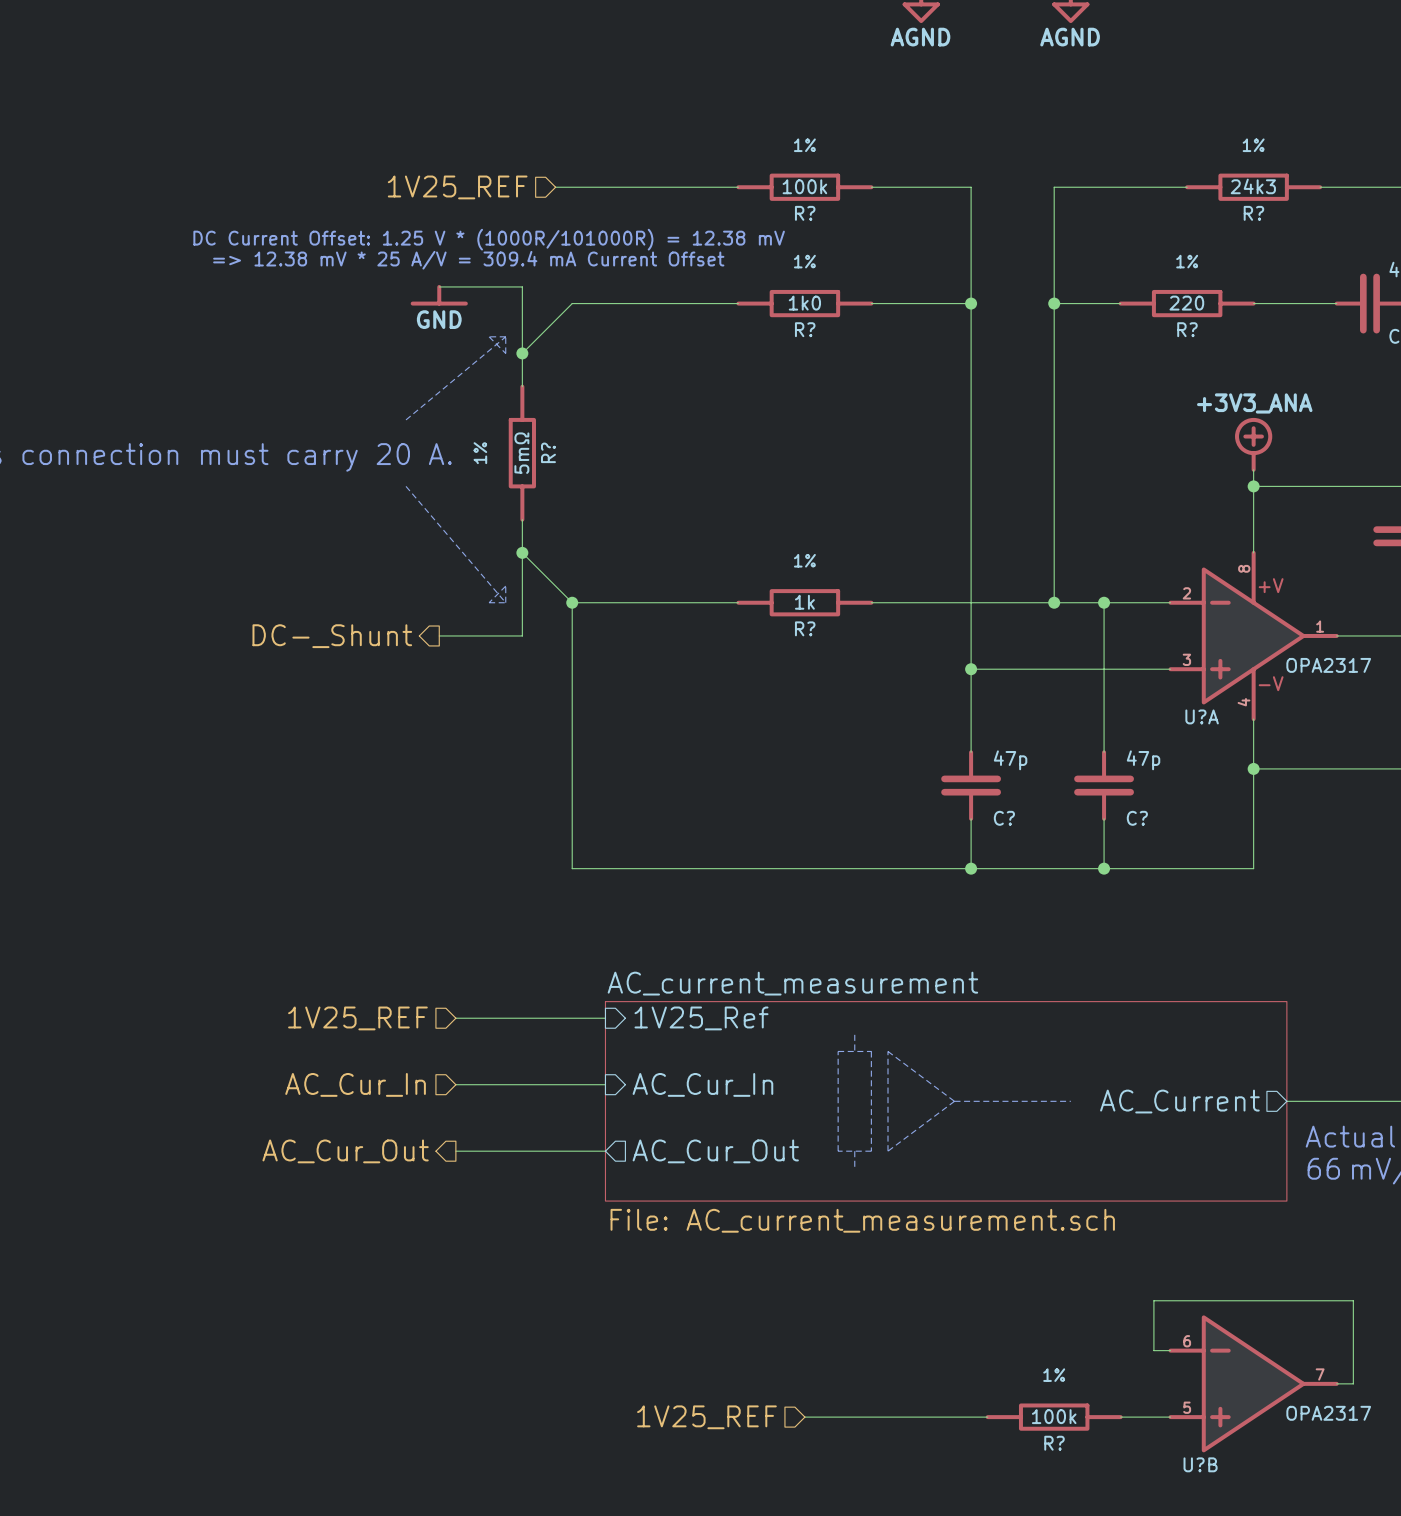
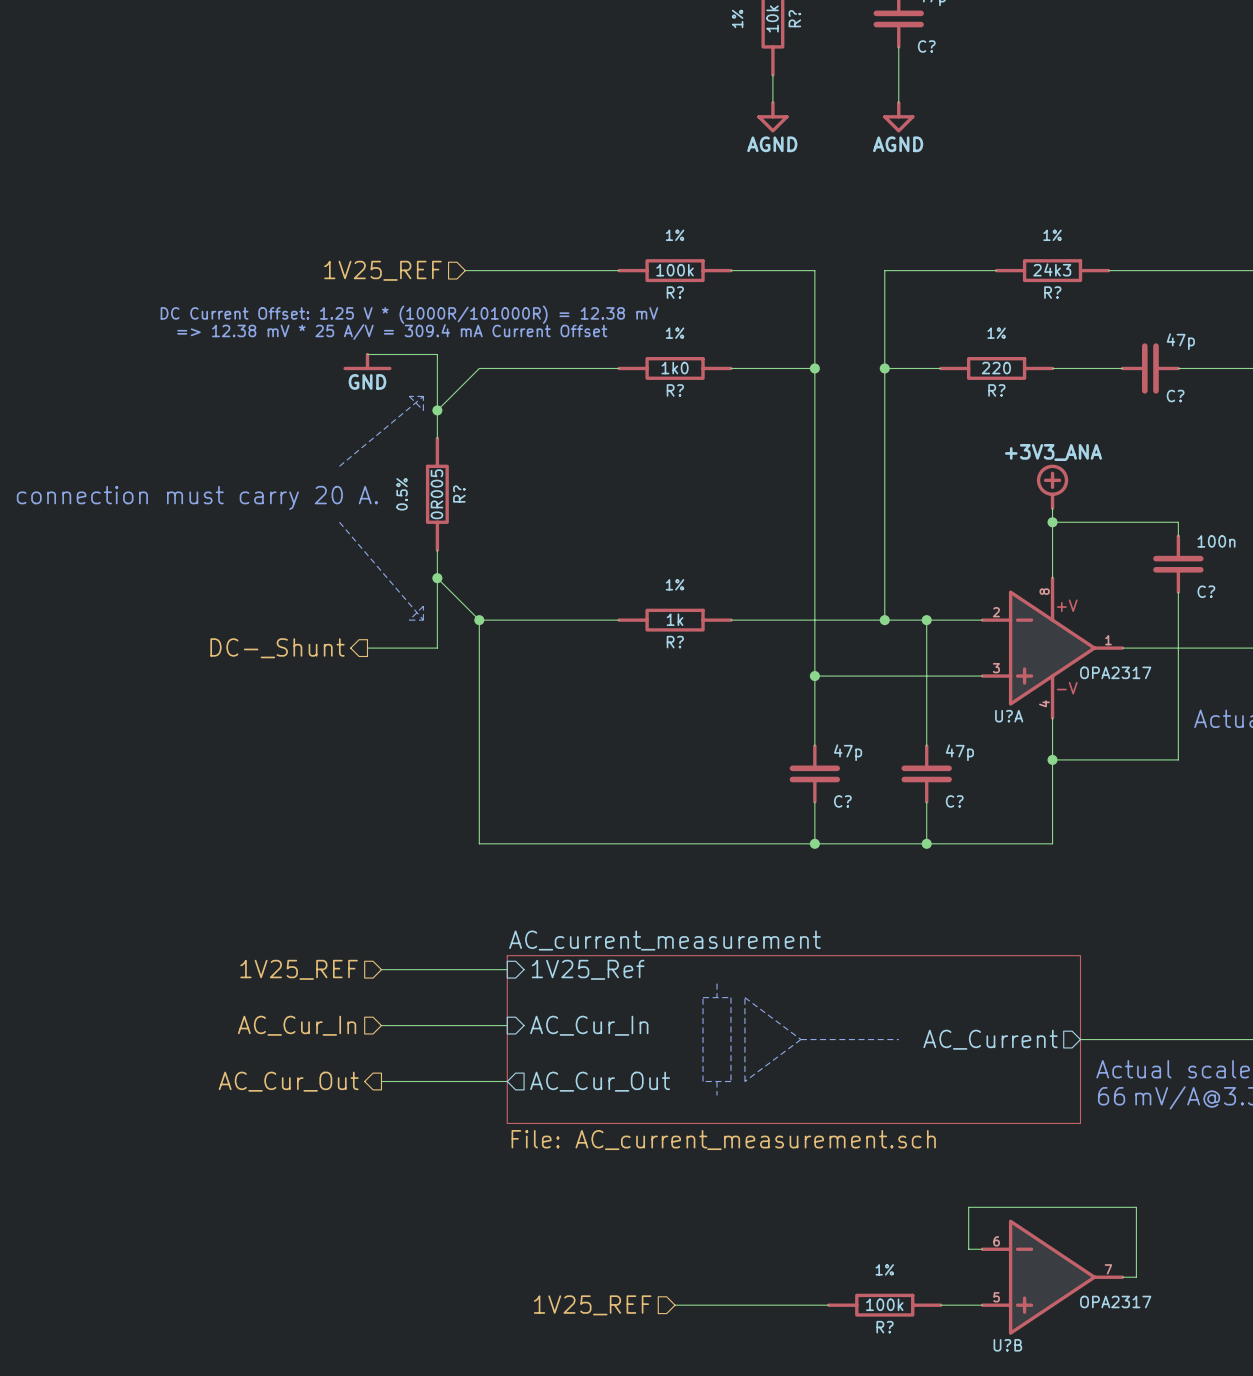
R? text: 1% (480, 453) -> 0.5% (402, 494)
R? value: 5mΩ (521, 453) -> 0R005 (436, 494)

